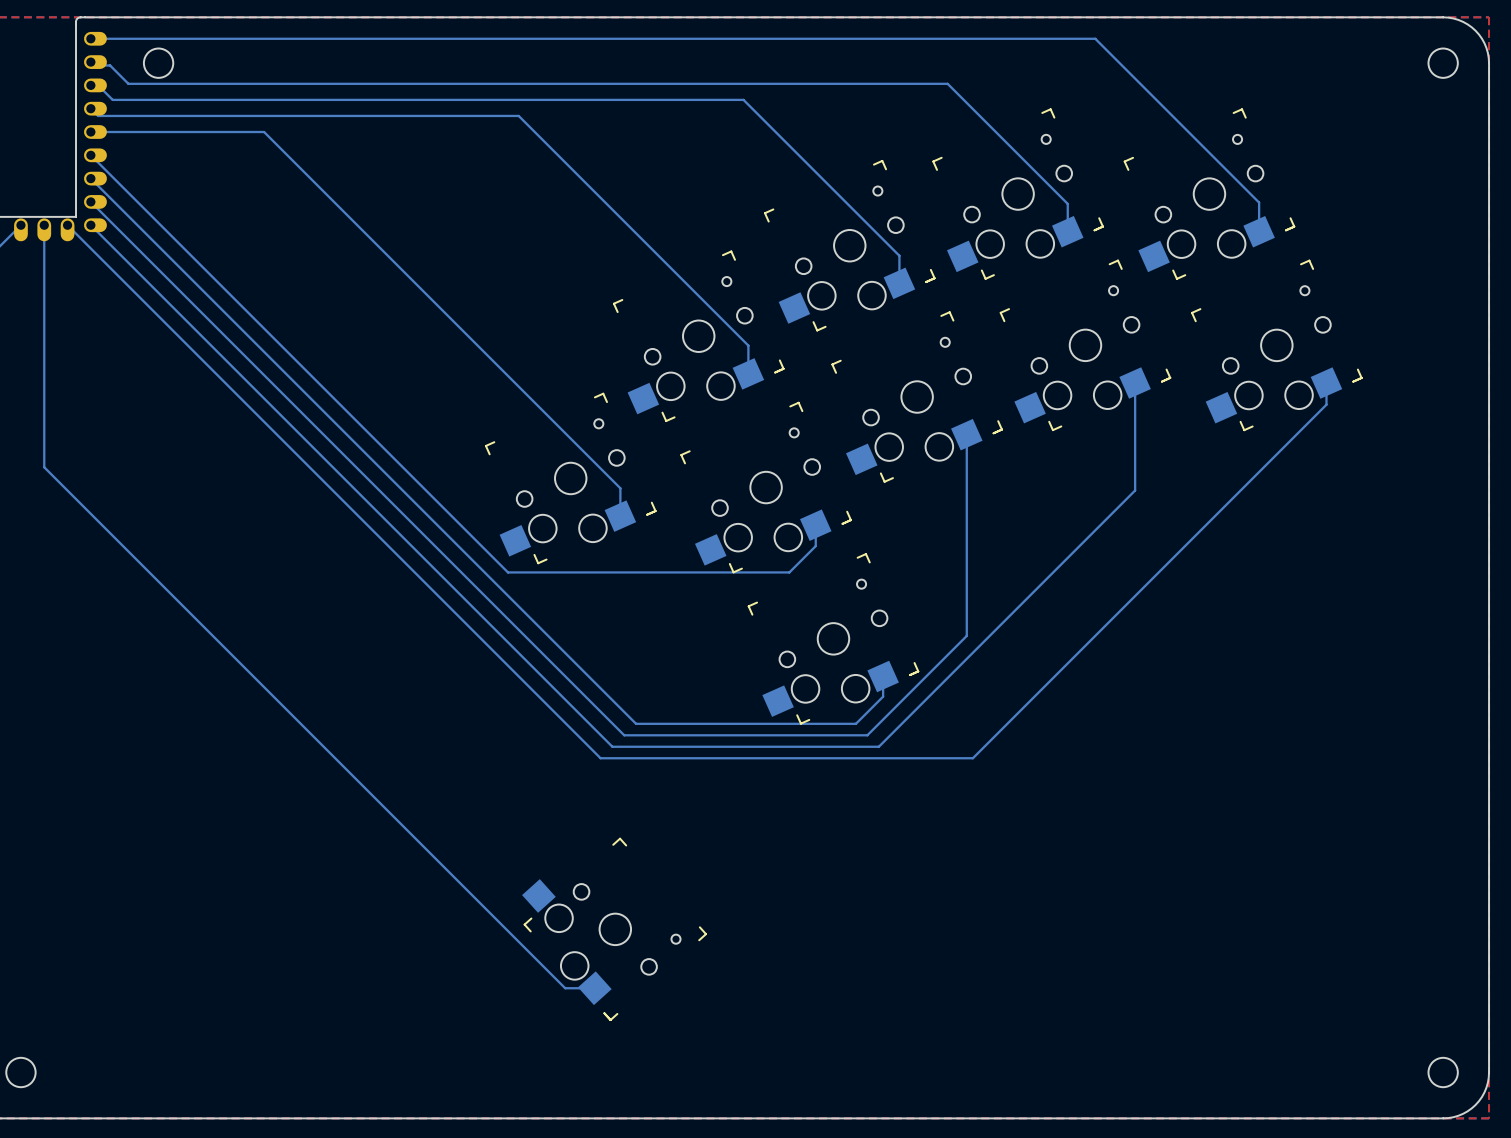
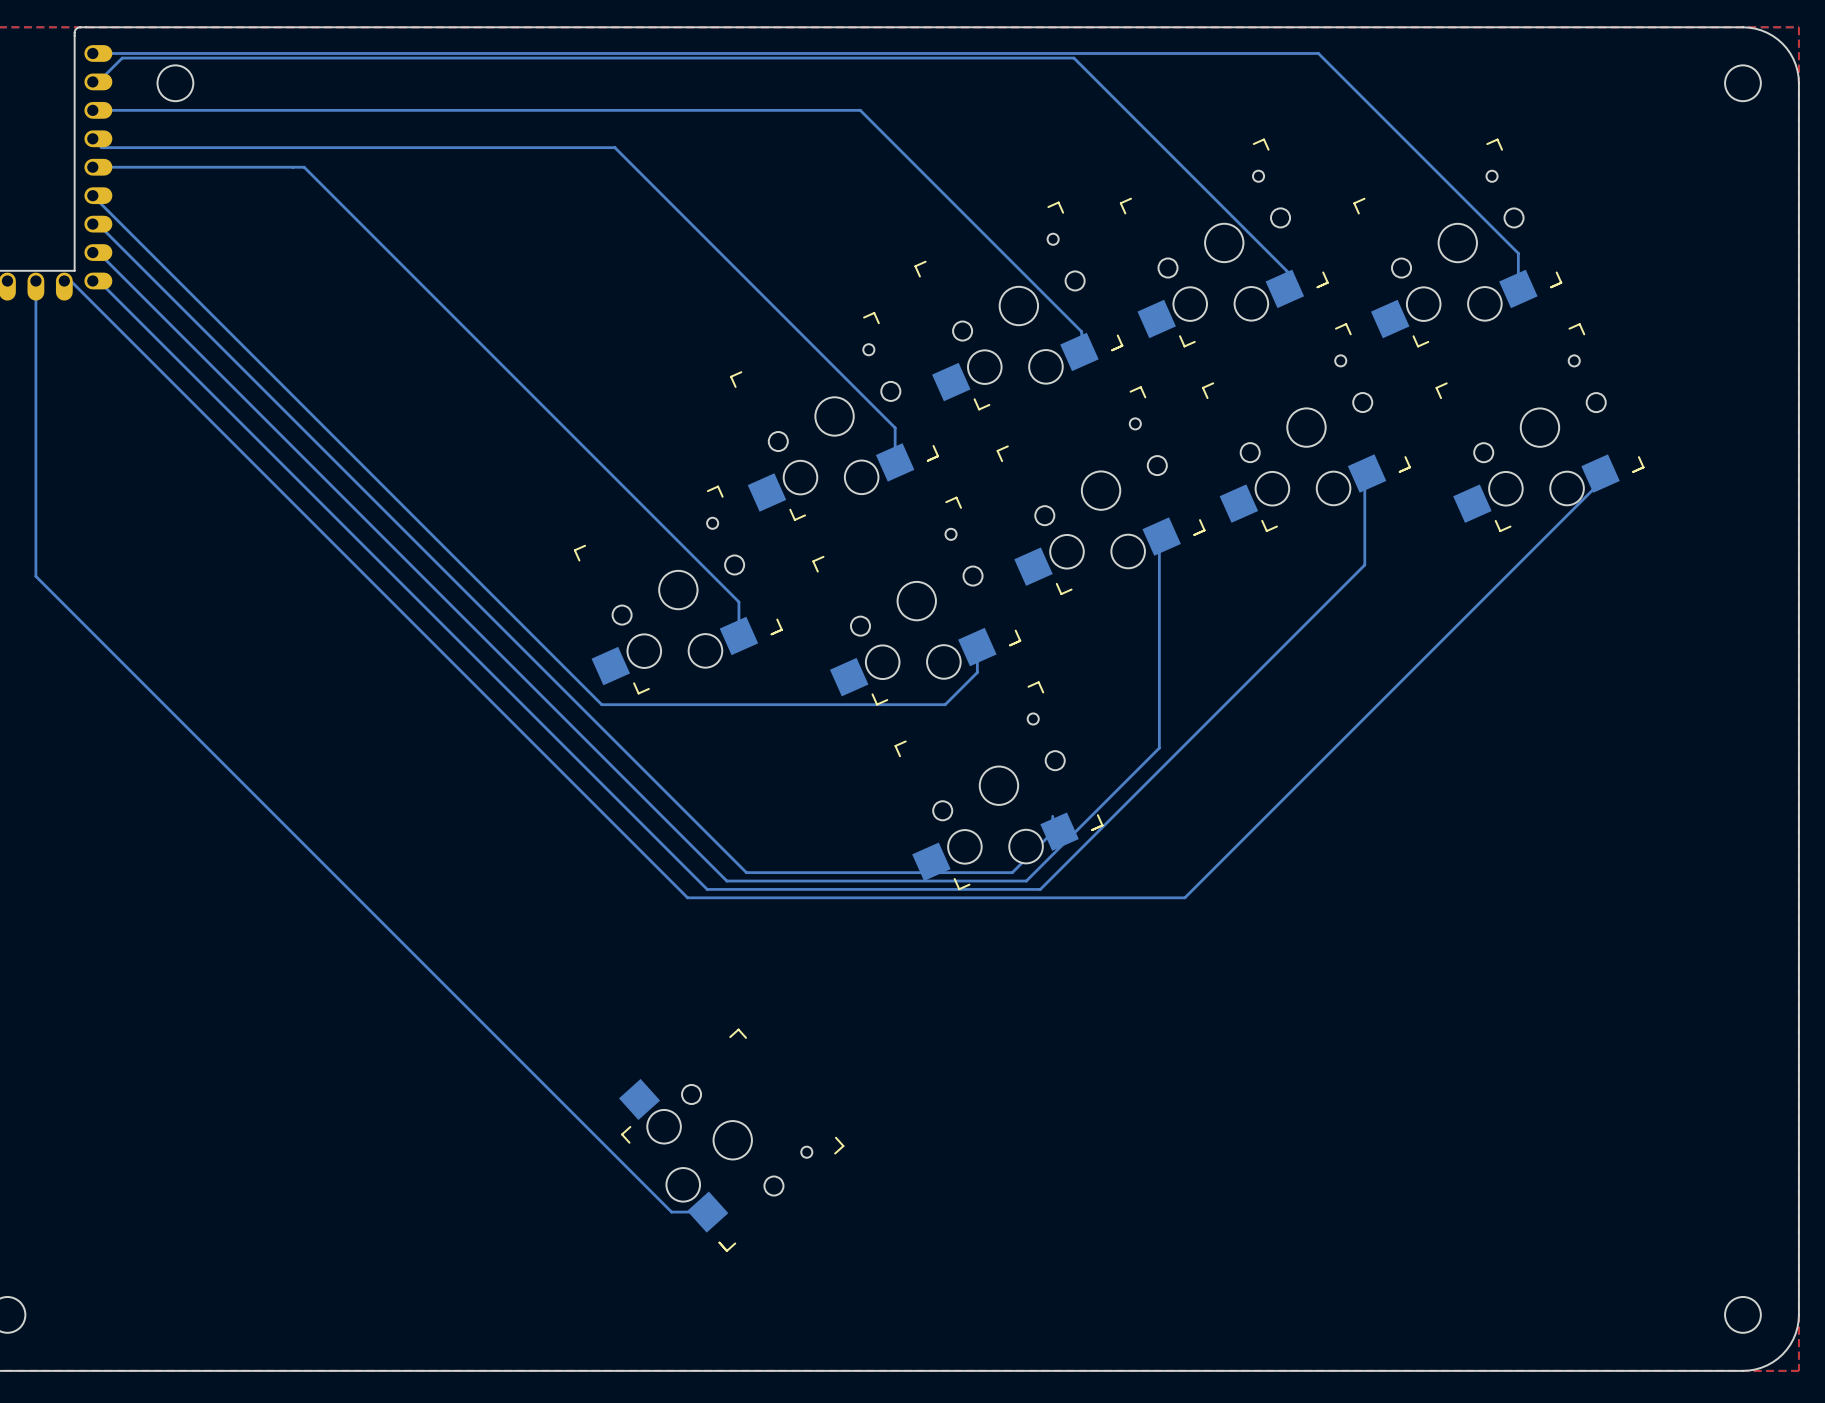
bottom track: (90, 62) (94, 65) (110, 65) (128, 83) (947, 83) (1067, 203) (1067, 231) -> (92, 81) (98, 81) (122, 58) (1073, 58) (1287, 271) (1287, 294)
bottom track: (98, 85) (112, 99) (743, 99) (899, 255) (899, 283) -> (101, 110) (860, 110) (1081, 331) (1081, 357)
bottom track: (90, 178) (636, 723) -> (92, 281) (98, 281) (707, 889) (758, 889)
bottom track: none -> (92, 224) (97, 224) (746, 872) (1012, 872) (1052, 832) (1052, 816)
bottom track: (90, 201) (624, 735) (867, 735) (966, 635) (966, 434) -> (92, 252) (98, 252) (726, 881) (1026, 881) (1159, 748) (1159, 531)
bottom track: (67, 225) (600, 758) (972, 758) (1326, 404) (1326, 383) -> (64, 281) (70, 281) (687, 897) (1184, 897) (1598, 484) (1598, 468)
bottom track: (90, 225) (612, 746) (878, 746) (1135, 490) (1135, 383) -> none
bottom track: (883, 676) (883, 696) (855, 723) -> (1364, 468) (1364, 565) (1040, 889) (1026, 889)

